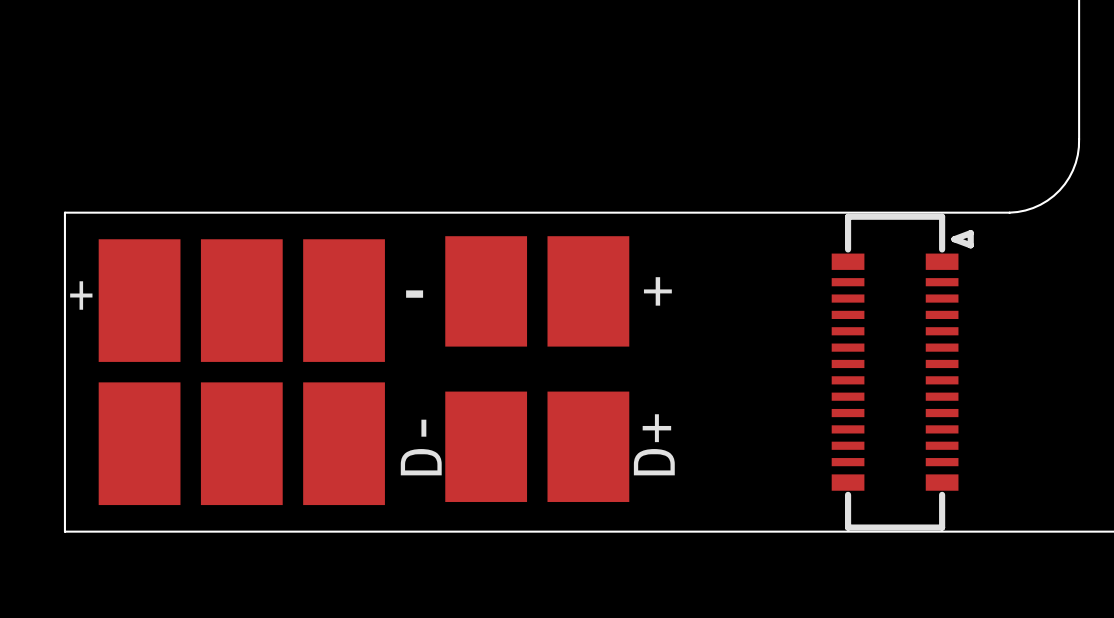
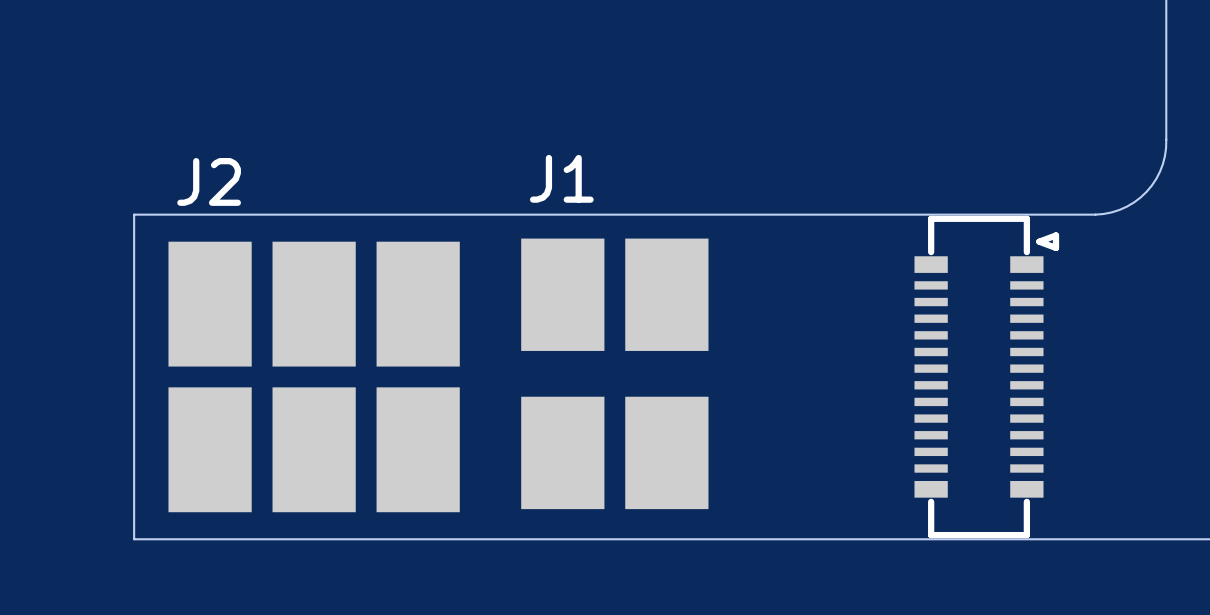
J1 name: none -> J1 (561, 178)
J2 name: none -> J2 (209, 181)
text: + (657, 291) -> none
text: - (414, 294) -> none
text: + (81, 295) -> none
text: D+ (654, 444) -> none
text: D- (421, 447) -> none

